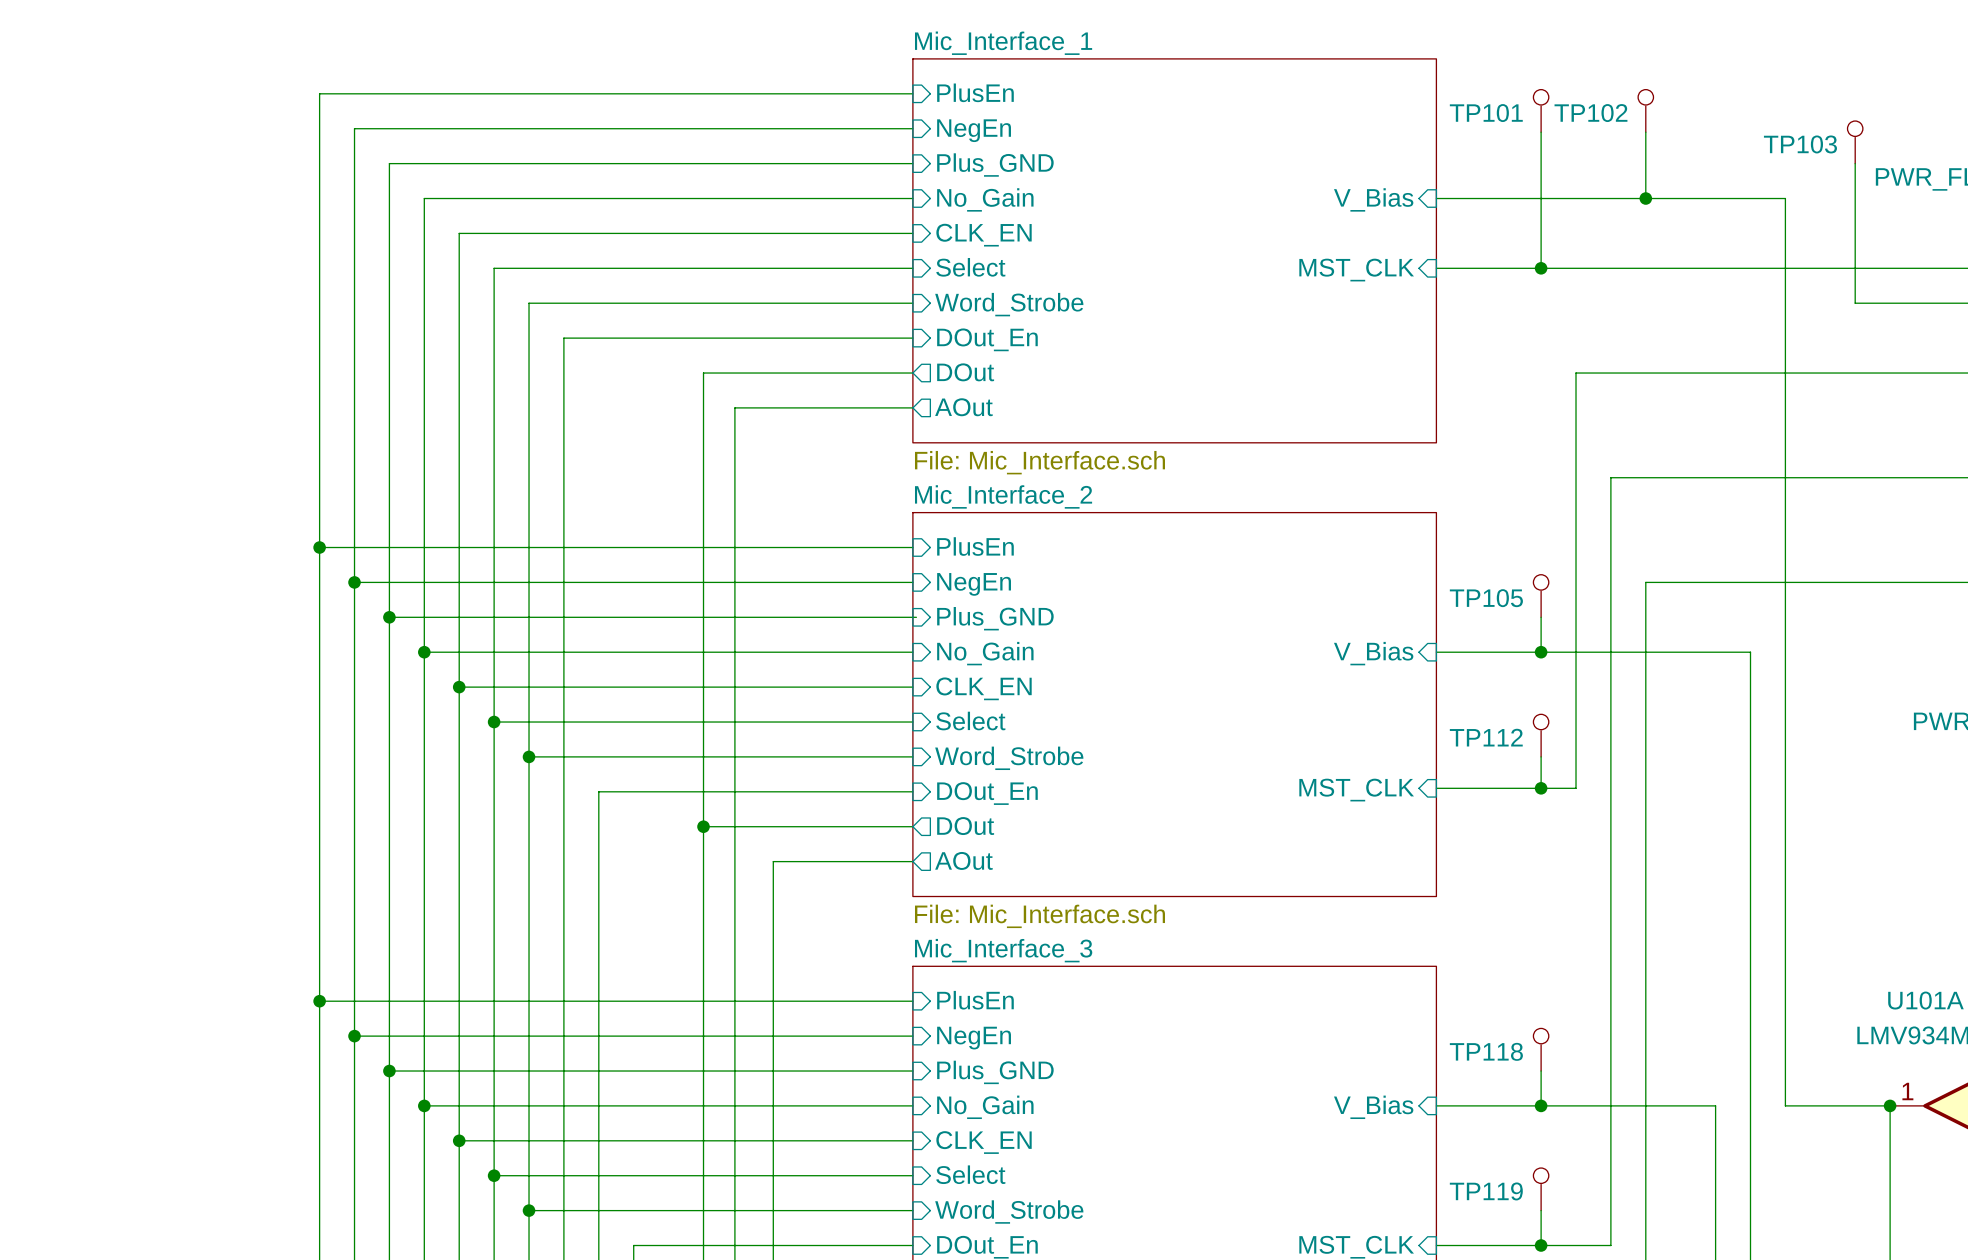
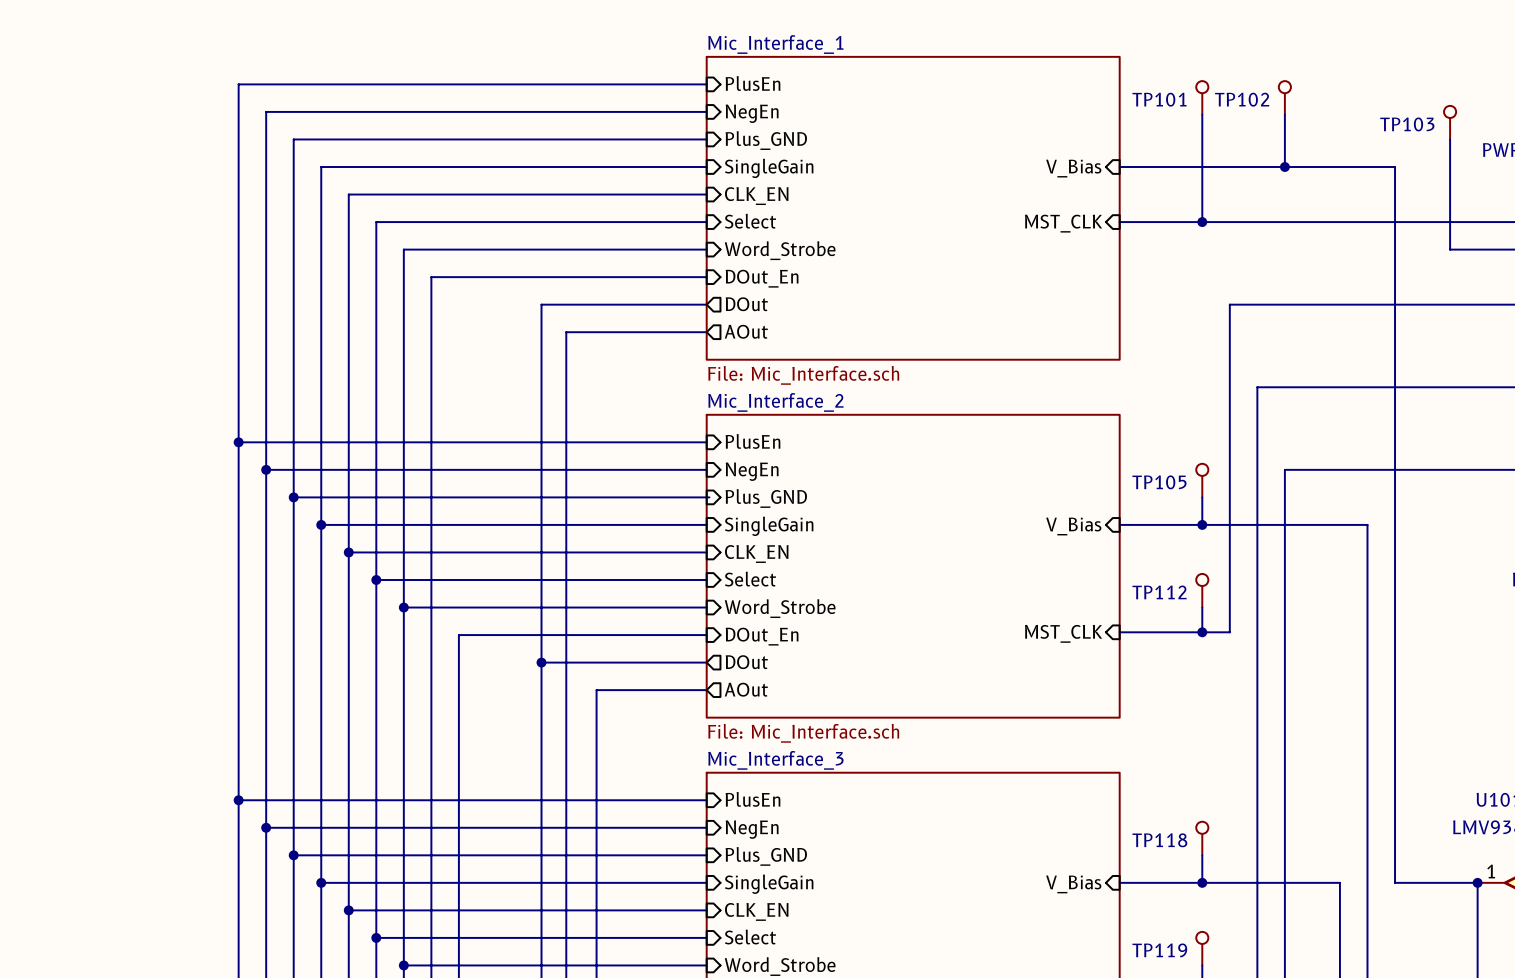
sheet pin: No_Gain (985, 199) -> SingleGain (769, 168)
sheet pin: No_Gain (985, 653) -> SingleGain (769, 526)
sheet pin: No_Gain (985, 1107) -> SingleGain (769, 884)

